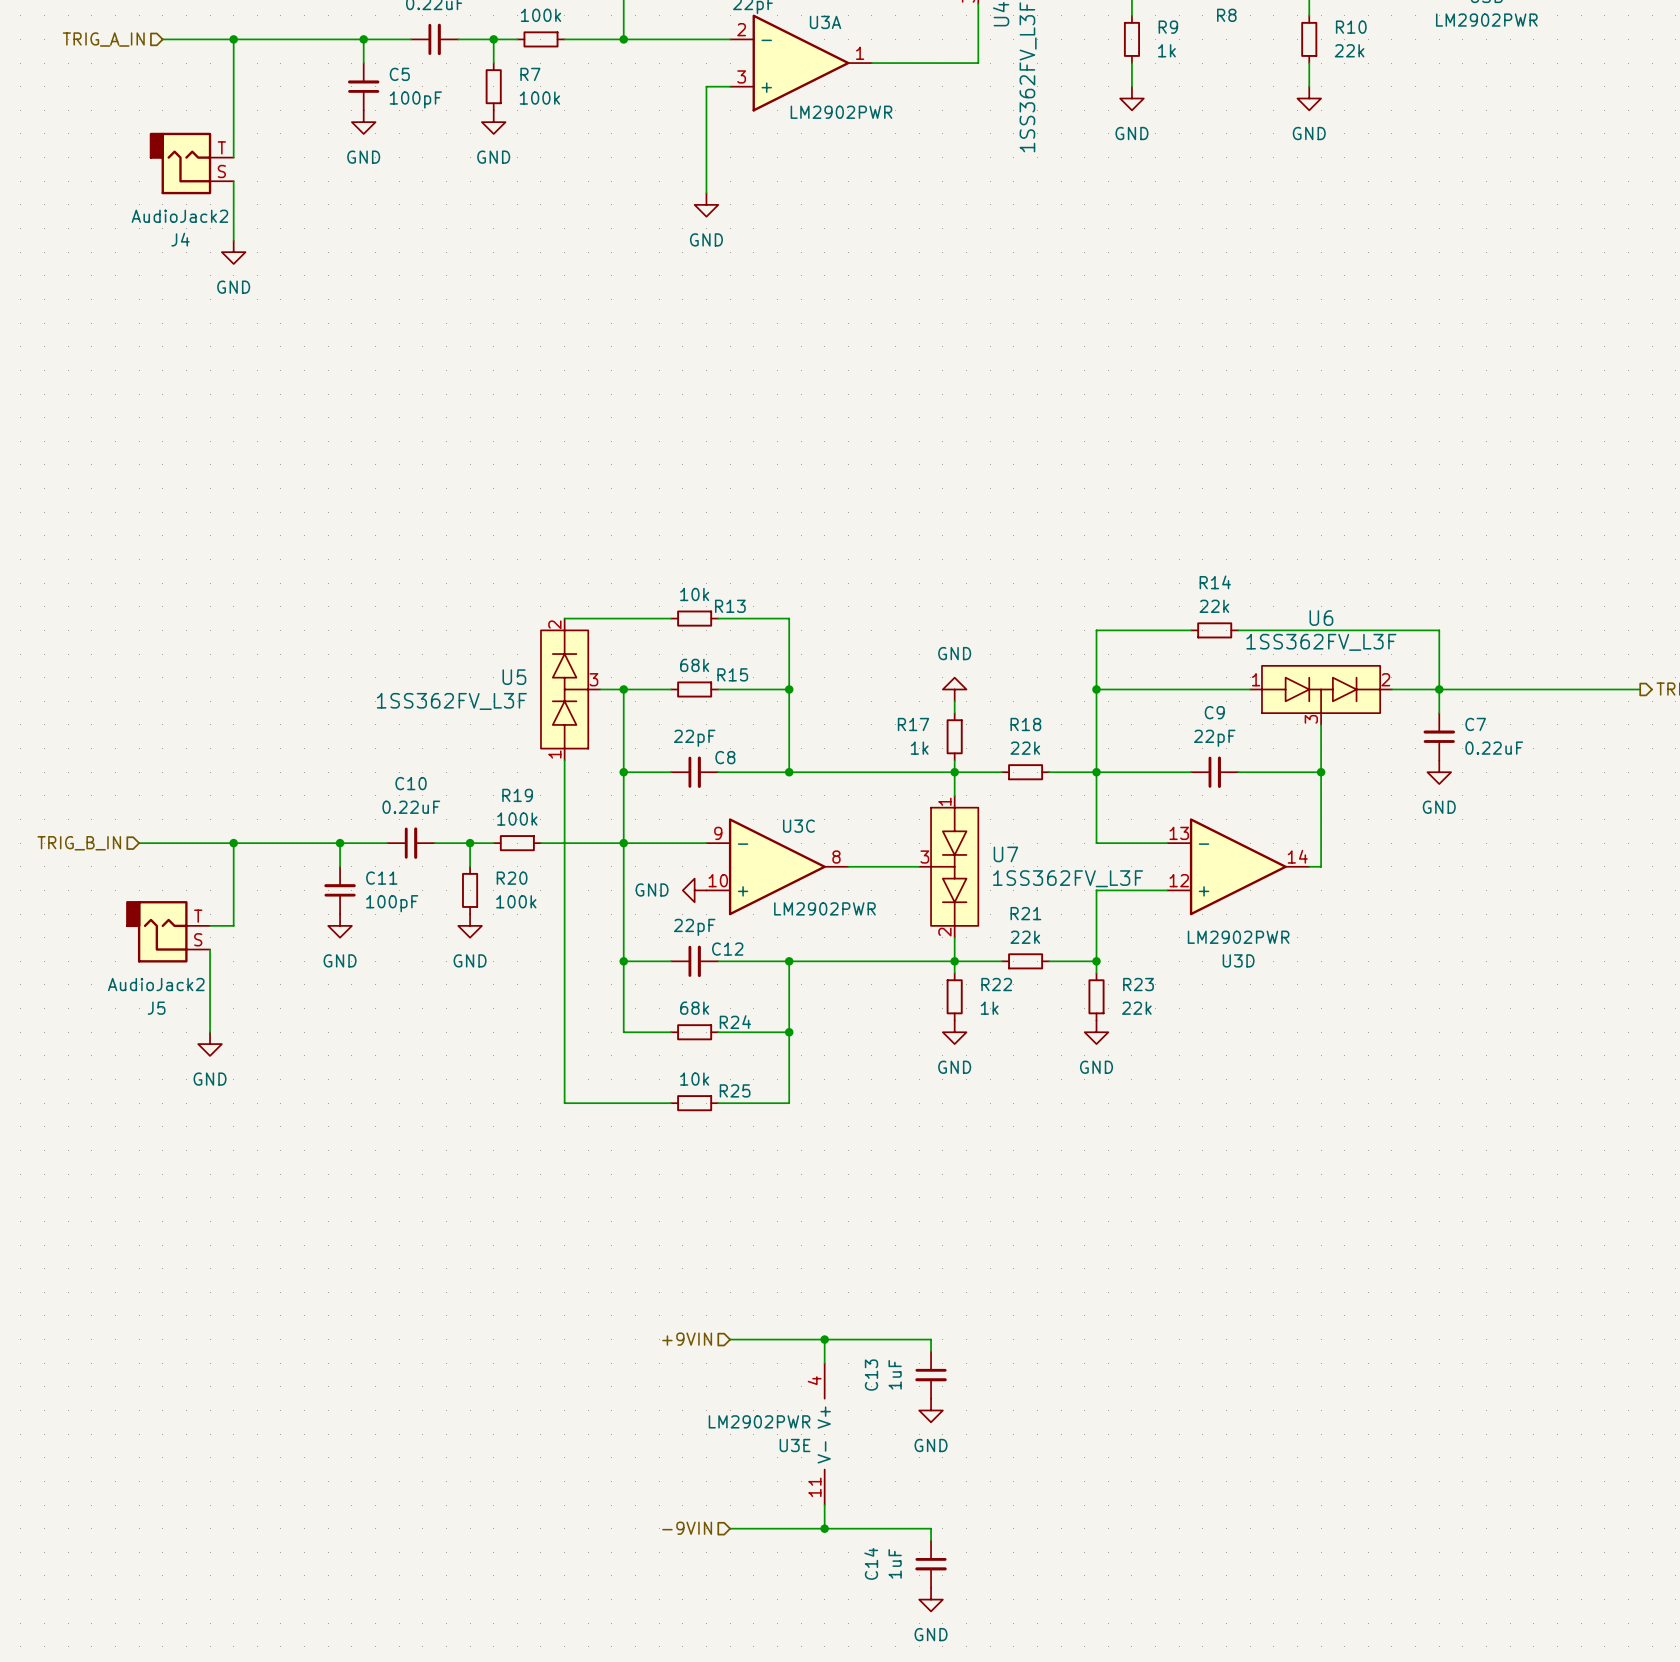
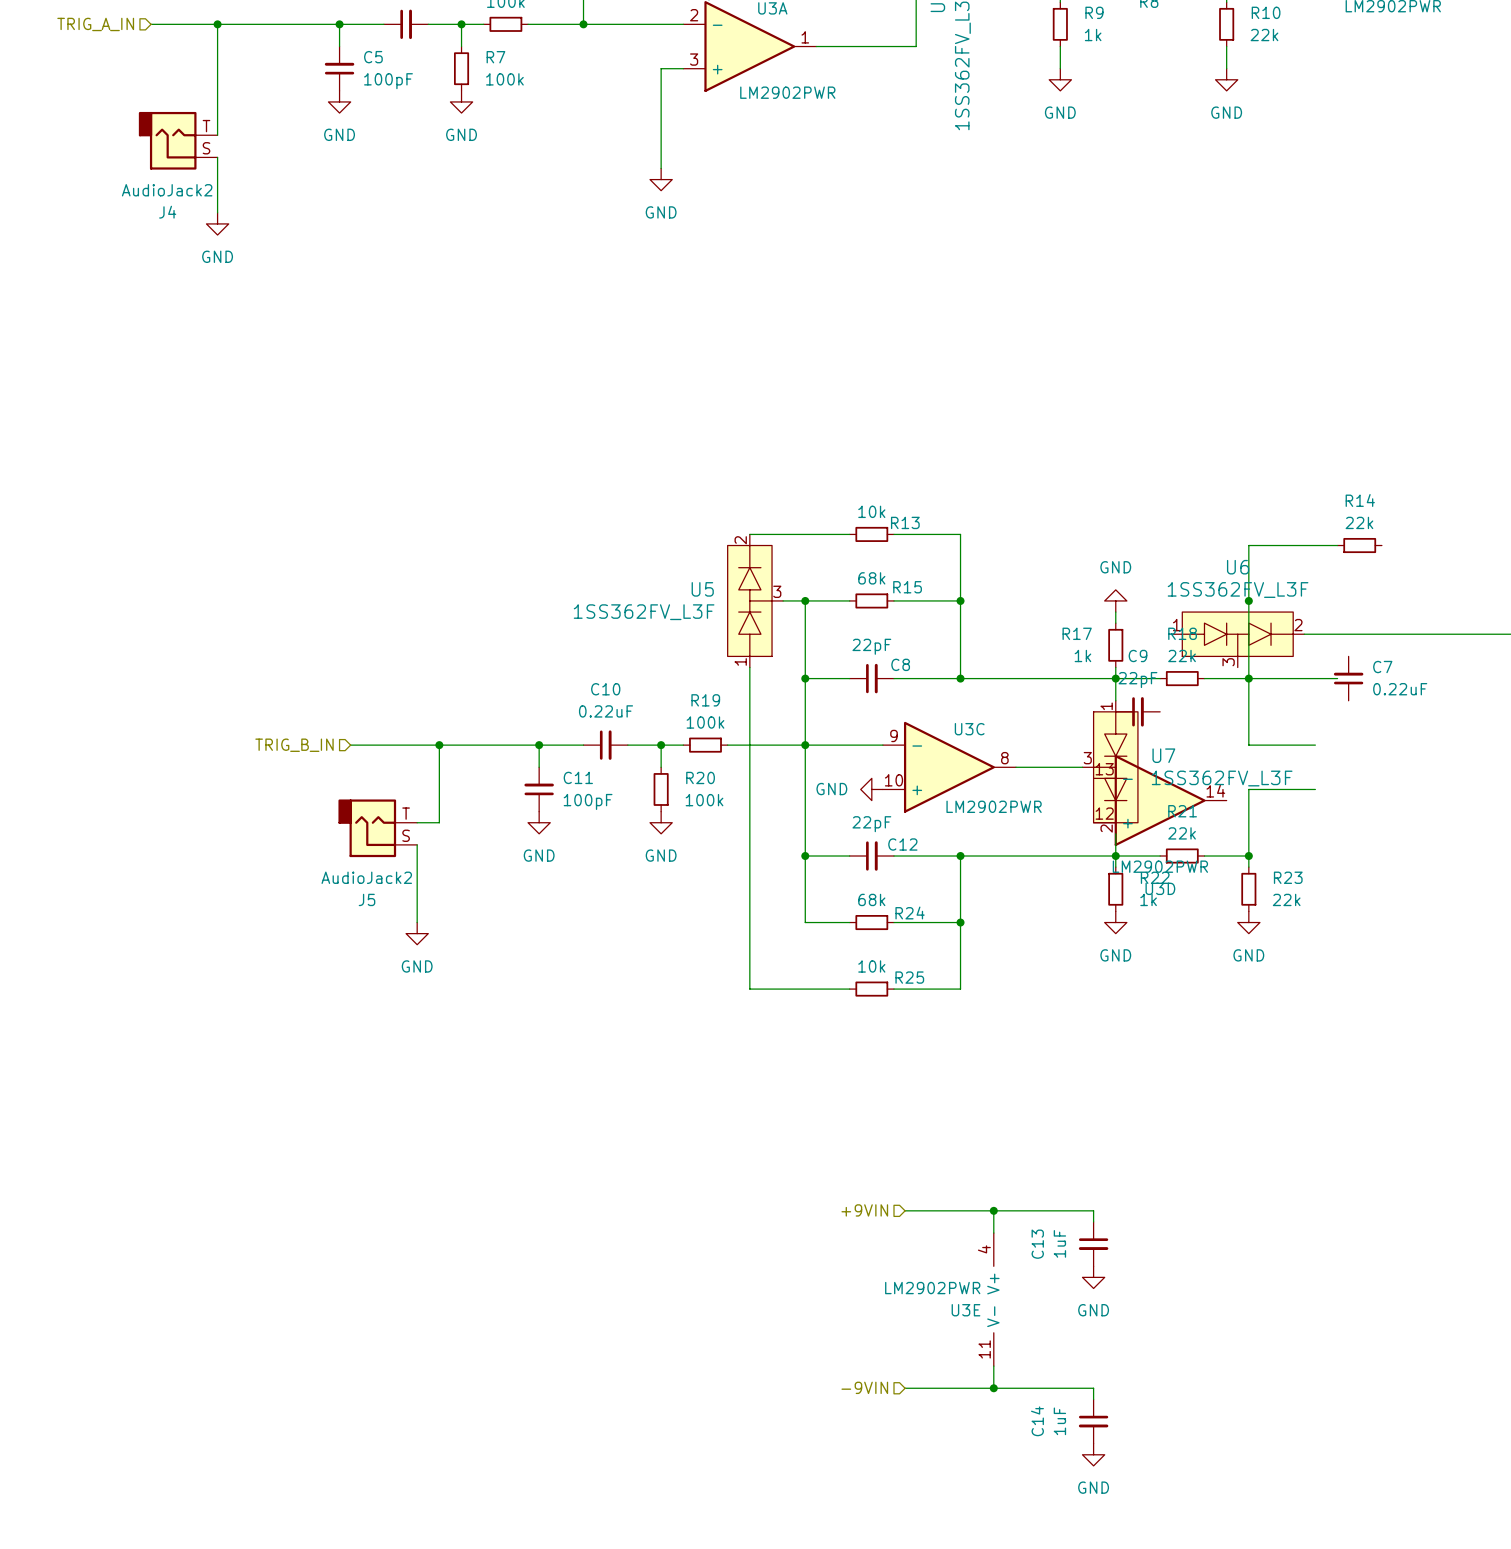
wire: none -> (749, 534) (849, 534)
wire: none -> (893, 534) (960, 534) (960, 678)
wire: none -> (1337, 545) (1248, 545) (1248, 745) (1315, 745)
wire: (564, 618) (671, 618) -> none
R13 position: (694, 618) -> (871, 534)
wire: (718, 618) (789, 618) (789, 772) -> none
wire: (1191, 630) (1096, 630) (1096, 843) (1167, 843) -> none
R14 position: (1214, 630) -> (1359, 545)
wire: (1238, 630) (1439, 630) (1439, 713) -> none
wire: none -> (805, 600) (805, 922) (849, 922)
junction: none -> (805, 600)
wire: none -> (893, 600) (960, 600)
junction: none -> (960, 600)
power symbol: none -> GND (1115, 600)
junction: none -> (1248, 600)
wire: none -> (1115, 612) (1115, 623)
U5 position: (570, 689) -> (755, 600)
wire: (600, 689) (671, 689) -> none
wire: (623, 689) (623, 1032) (671, 1032) -> none
junction: (623, 689) -> none
R15 position: (694, 689) -> (871, 600)
wire: (718, 689) (789, 689) -> (783, 600) (849, 600)
junction: (789, 689) -> none
power symbol: GND (954, 689) -> none
wire: (1096, 689) (1250, 689) -> none
junction: (1096, 689) -> none
junction: (1439, 689) -> none
wire: (954, 701) (954, 713) -> none
wire: none -> (749, 667) (749, 989) (849, 989)
wire: none -> (1115, 667) (1115, 700)
wire: (1321, 724) (1321, 866) (1309, 866) -> none
wire: none -> (805, 678) (849, 678)
junction: none -> (805, 678)
wire: none -> (893, 678) (1160, 678)
R17 position: (954, 736) -> (1115, 645)
junction: none -> (960, 678)
junction: none -> (1115, 678)
wire: none -> (1204, 678) (1337, 678)
wire: (564, 760) (564, 1103) (671, 1103) -> none
wire: (954, 760) (954, 795) -> none
wire: (623, 772) (671, 772) -> none
junction: (623, 772) -> none
C8 position: (694, 772) -> (871, 678)
wire: (718, 772) (1001, 772) -> none
junction: (789, 772) -> none
junction: (954, 772) -> none
R18 position: (1025, 772) -> (1182, 678)
wire: (1049, 772) (1191, 772) -> none
junction: (1096, 772) -> none
wire: (1238, 772) (1321, 772) -> none
junction position: (1321, 772) -> (1248, 678)
power symbol: GND (1439, 772) -> none
hierarchical label: none -> TRIG_B_IN (294, 745)
wire: none -> (350, 745) (583, 745)
wire: none -> (439, 745) (439, 778)
wire: none -> (539, 745) (539, 767)
junction: none -> (539, 745)
wire: none -> (627, 745) (683, 745)
wire: none -> (661, 745) (661, 767)
junction: none -> (661, 745)
wire: none -> (727, 745) (882, 745)
junction: none -> (805, 745)
wire: none -> (1015, 767) (1082, 767)
hierarchical label: TRIG_B_IN (79, 843) -> none
wire: (139, 843) (387, 843) -> none
wire: (233, 843) (233, 925) (210, 925) -> none
junction: (233, 843) -> none
wire: (340, 843) (340, 866) -> none
junction: (340, 843) -> none
C10 position: (410, 843) -> (605, 745)
wire: (434, 843) (493, 843) -> none
junction position: (470, 843) -> (439, 745)
R19 position: (517, 843) -> (705, 745)
wire: (540, 843) (706, 843) -> none
junction: (623, 843) -> none
power symbol: none -> GND (871, 789)
wire: none -> (1315, 789) (1248, 789) (1248, 867)
wire: none -> (439, 800) (439, 822) (417, 822)
U3C position: (777, 866) -> (949, 767)
wire: (848, 866) (919, 866) -> (893, 922) (960, 922)
U7 position: (948, 866) -> (1110, 767)
C11 position: (340, 890) -> (539, 789)
R20 position: (470, 890) -> (661, 789)
power symbol: none -> GND (539, 822)
power symbol rotation: 0° (694, 890) -> 90° counterclockwise (661, 822)
wire: (1167, 890) (1096, 890) (1096, 973) -> none
wire: none -> (1115, 833) (1115, 867)
wire: none -> (417, 844) (417, 922)
power symbol: GND (340, 925) -> none
power symbol: GND (470, 925) -> none
junction: none -> (805, 856)
wire: none -> (893, 856) (1160, 856)
wire: none -> (960, 856) (960, 989) (893, 989)
junction: none -> (960, 856)
junction: none -> (1115, 856)
wire: none -> (1204, 856) (1248, 856)
junction: none -> (1248, 856)
J5 position: (168, 931) -> (377, 828)
wire: (954, 937) (954, 973) -> none
wire: (210, 949) (210, 1032) -> none
wire: (623, 961) (671, 961) -> none
junction: (623, 961) -> none
C12 position: (694, 961) -> (871, 856)
wire: (718, 961) (1001, 961) -> none
wire: (789, 961) (789, 1103) (718, 1103) -> none
junction: (789, 961) -> none
junction: (954, 961) -> none
R21 position: (1025, 961) -> (1182, 856)
wire: (1049, 961) (1096, 961) -> (805, 856) (849, 856)
junction: (1096, 961) -> none
R22 position: (954, 996) -> (1115, 889)
junction: none -> (960, 922)
R23 position: (1096, 996) -> (1248, 889)
power symbol: none -> GND (1248, 922)
power symbol: none -> GND (417, 933)
R24 position: (694, 1032) -> (871, 922)
wire: (718, 1032) (789, 1032) -> none
junction: (789, 1032) -> none
power symbol: GND (954, 1032) -> none
power symbol position: GND (1096, 1032) -> GND (1115, 922)
power symbol: GND (210, 1044) -> none
R25 position: (694, 1103) -> (871, 989)
hierarchical label: none -> +9VIN (864, 1210)
wire: none -> (905, 1210) (1093, 1210) (1093, 1221)
wire: none -> (993, 1210) (993, 1233)
junction: none -> (993, 1210)
hierarchical label: +9VIN (687, 1339) -> none
wire: (730, 1339) (931, 1339) (931, 1351) -> none
wire: (824, 1339) (824, 1363) -> none
junction: (824, 1339) -> none
C13 position: (931, 1375) -> (1093, 1244)
power symbol: none -> GND (1093, 1277)
power symbol: GND (931, 1410) -> none
U3E position: (824, 1434) -> (993, 1299)
wire: none -> (993, 1366) (993, 1388)
hierarchical label: none -> -9VIN (864, 1387)
wire: none -> (905, 1388) (1093, 1388) (1093, 1399)
junction: none -> (993, 1388)
wire: (824, 1505) (824, 1528) -> none
hierarchical label: -9VIN (687, 1528) -> none
wire: (730, 1528) (931, 1528) (931, 1540) -> none
junction: (824, 1528) -> none
C14 position: (931, 1564) -> (1093, 1421)
power symbol: none -> GND (1093, 1454)
power symbol: GND (931, 1599) -> none

